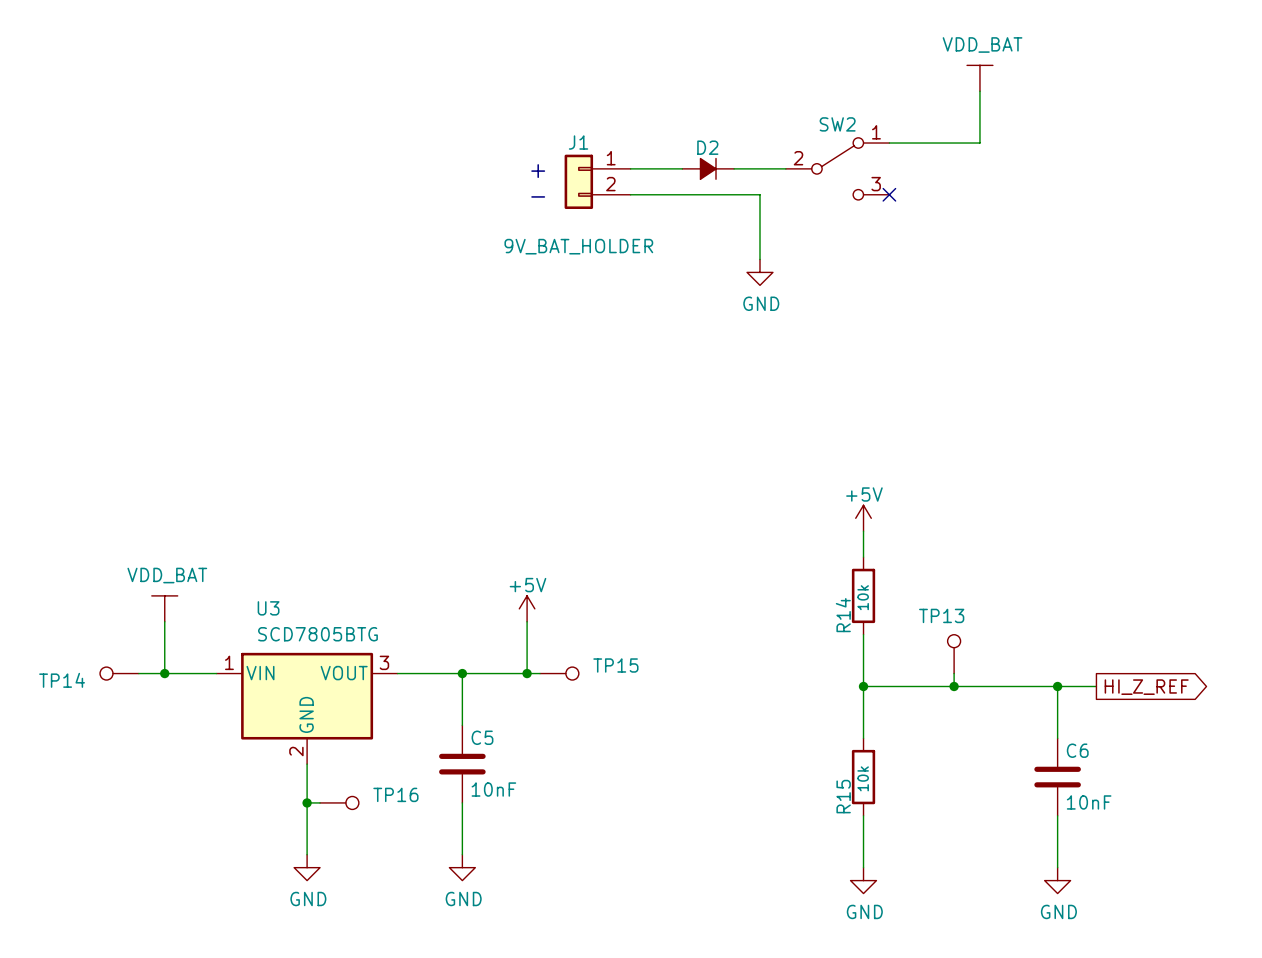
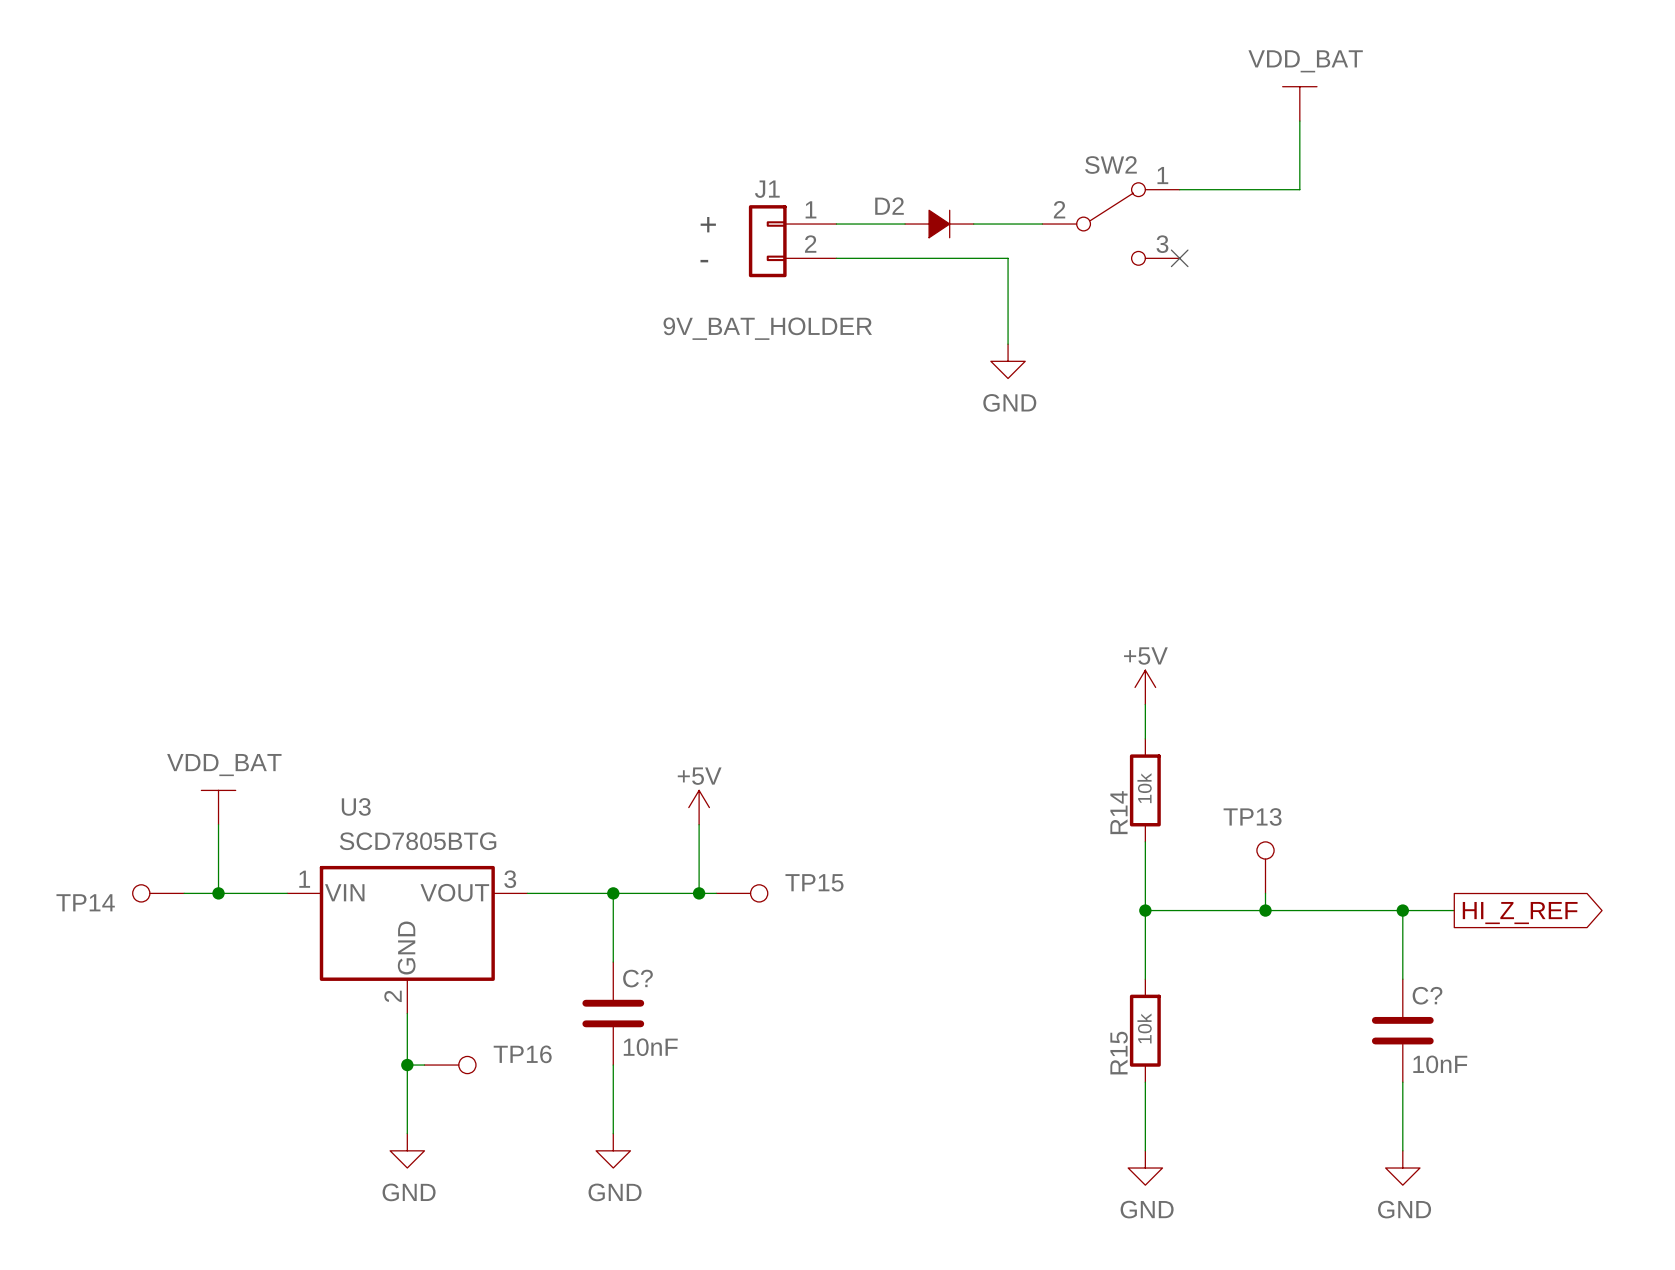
D2 name position: D2 (707, 147) -> D2 (889, 206)
C5 name: C5 (482, 737) -> C? (637, 978)
C6 name: C6 (1077, 750) -> C? (1427, 995)

